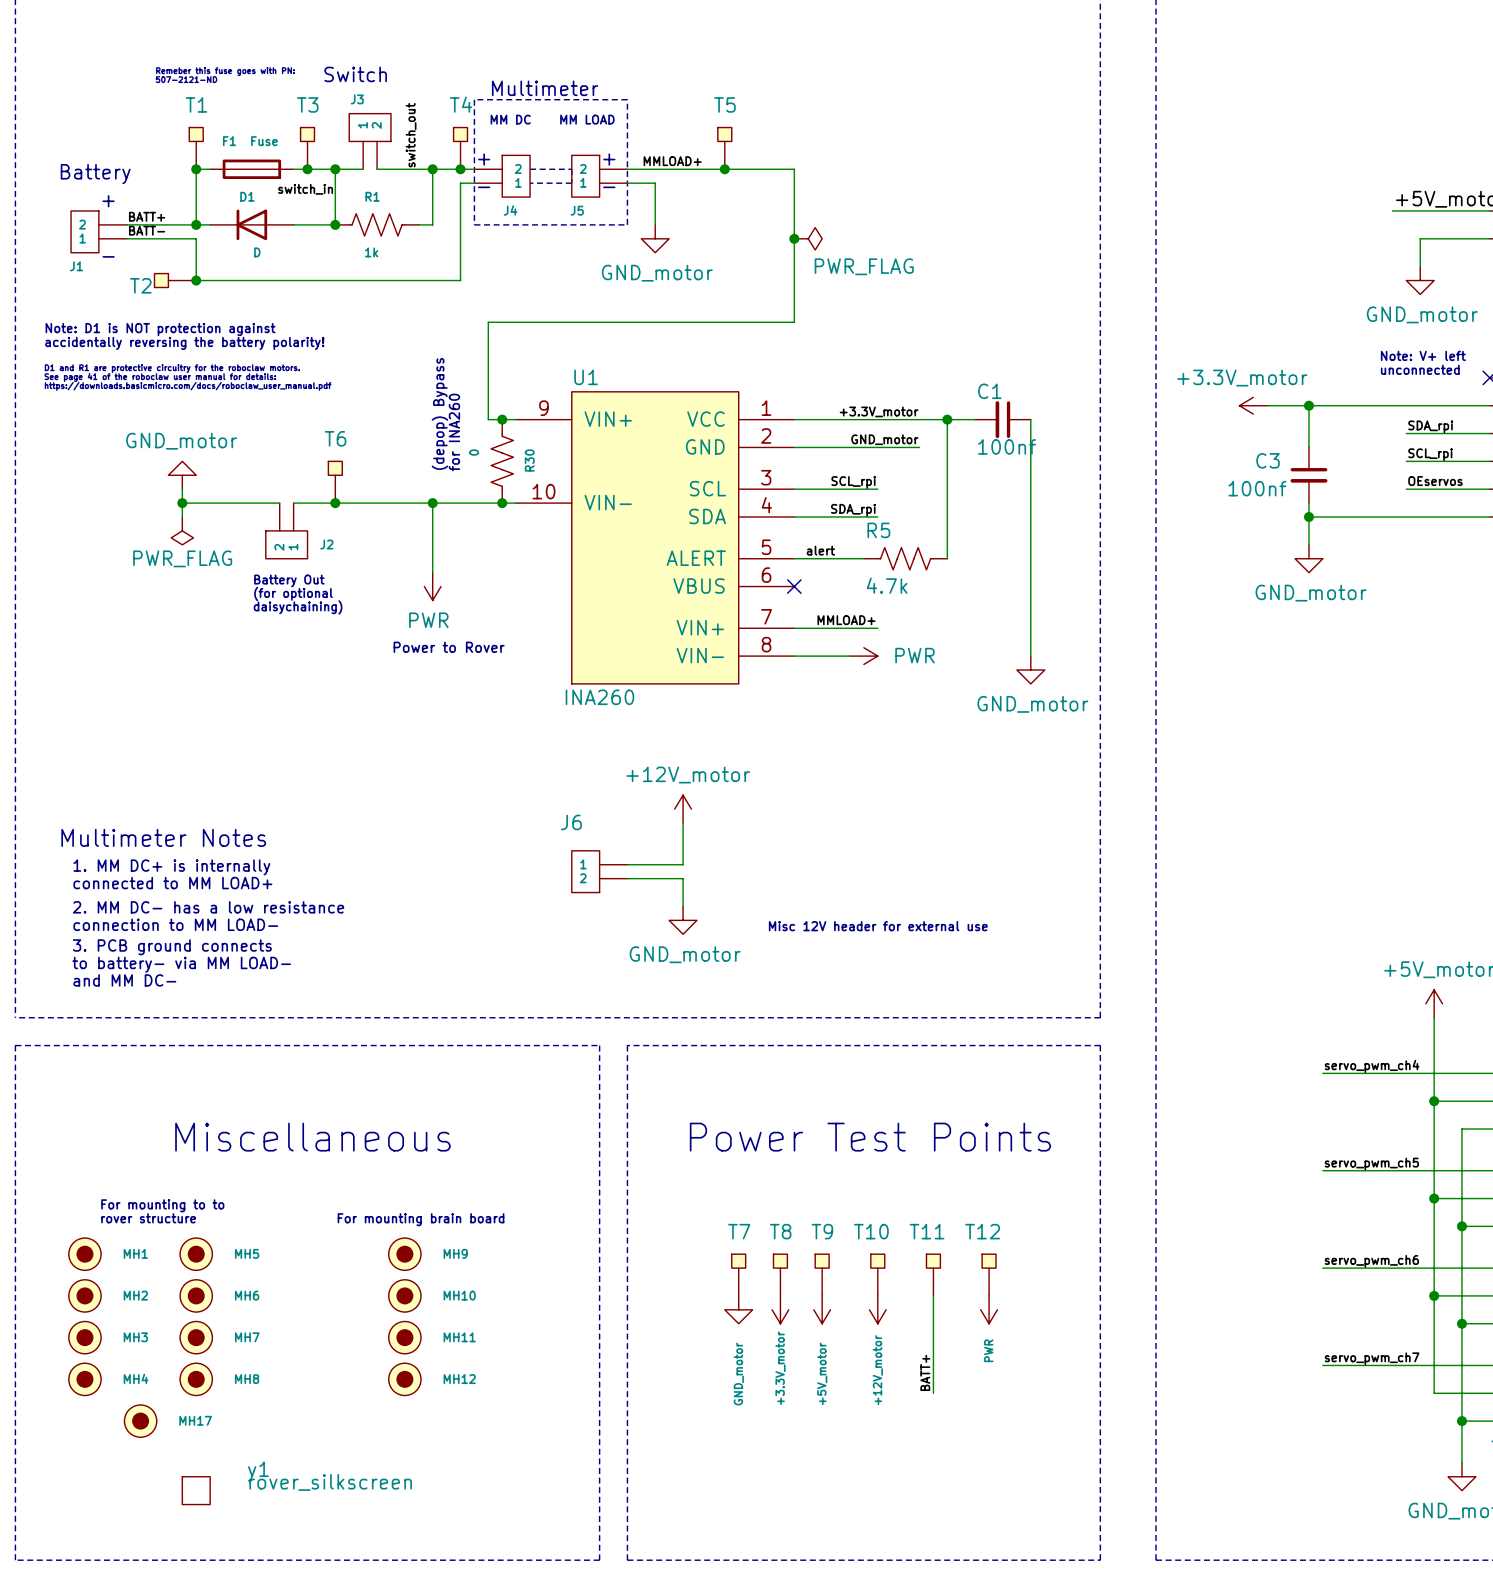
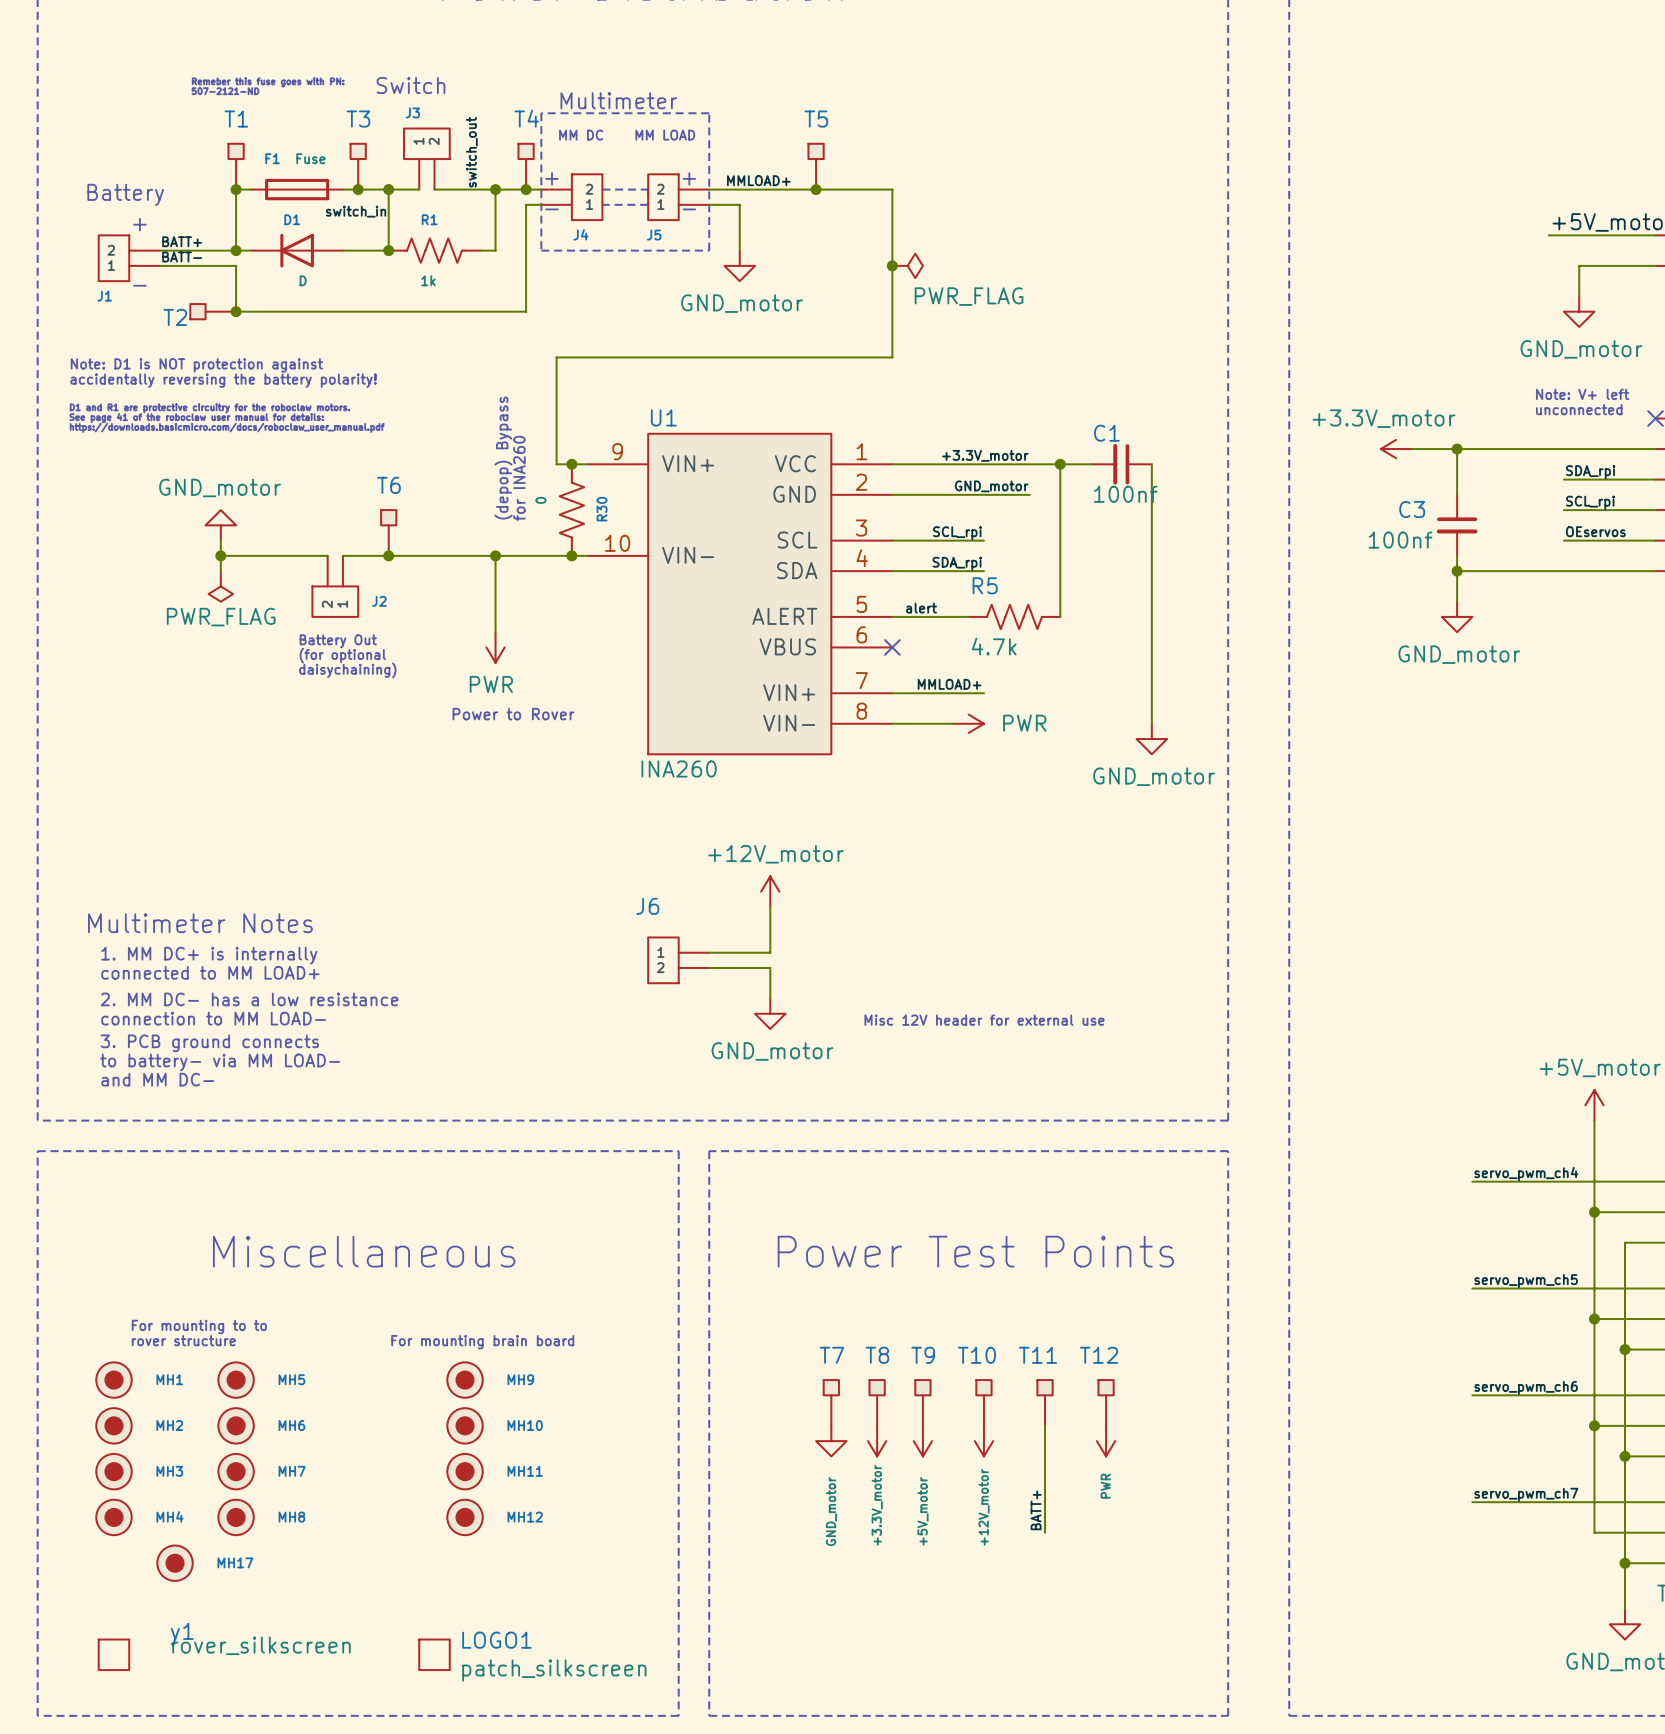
y1 position: (196, 1490) -> (113, 1654)
LOGO1: none -> patch_silkscreen (434, 1654)

